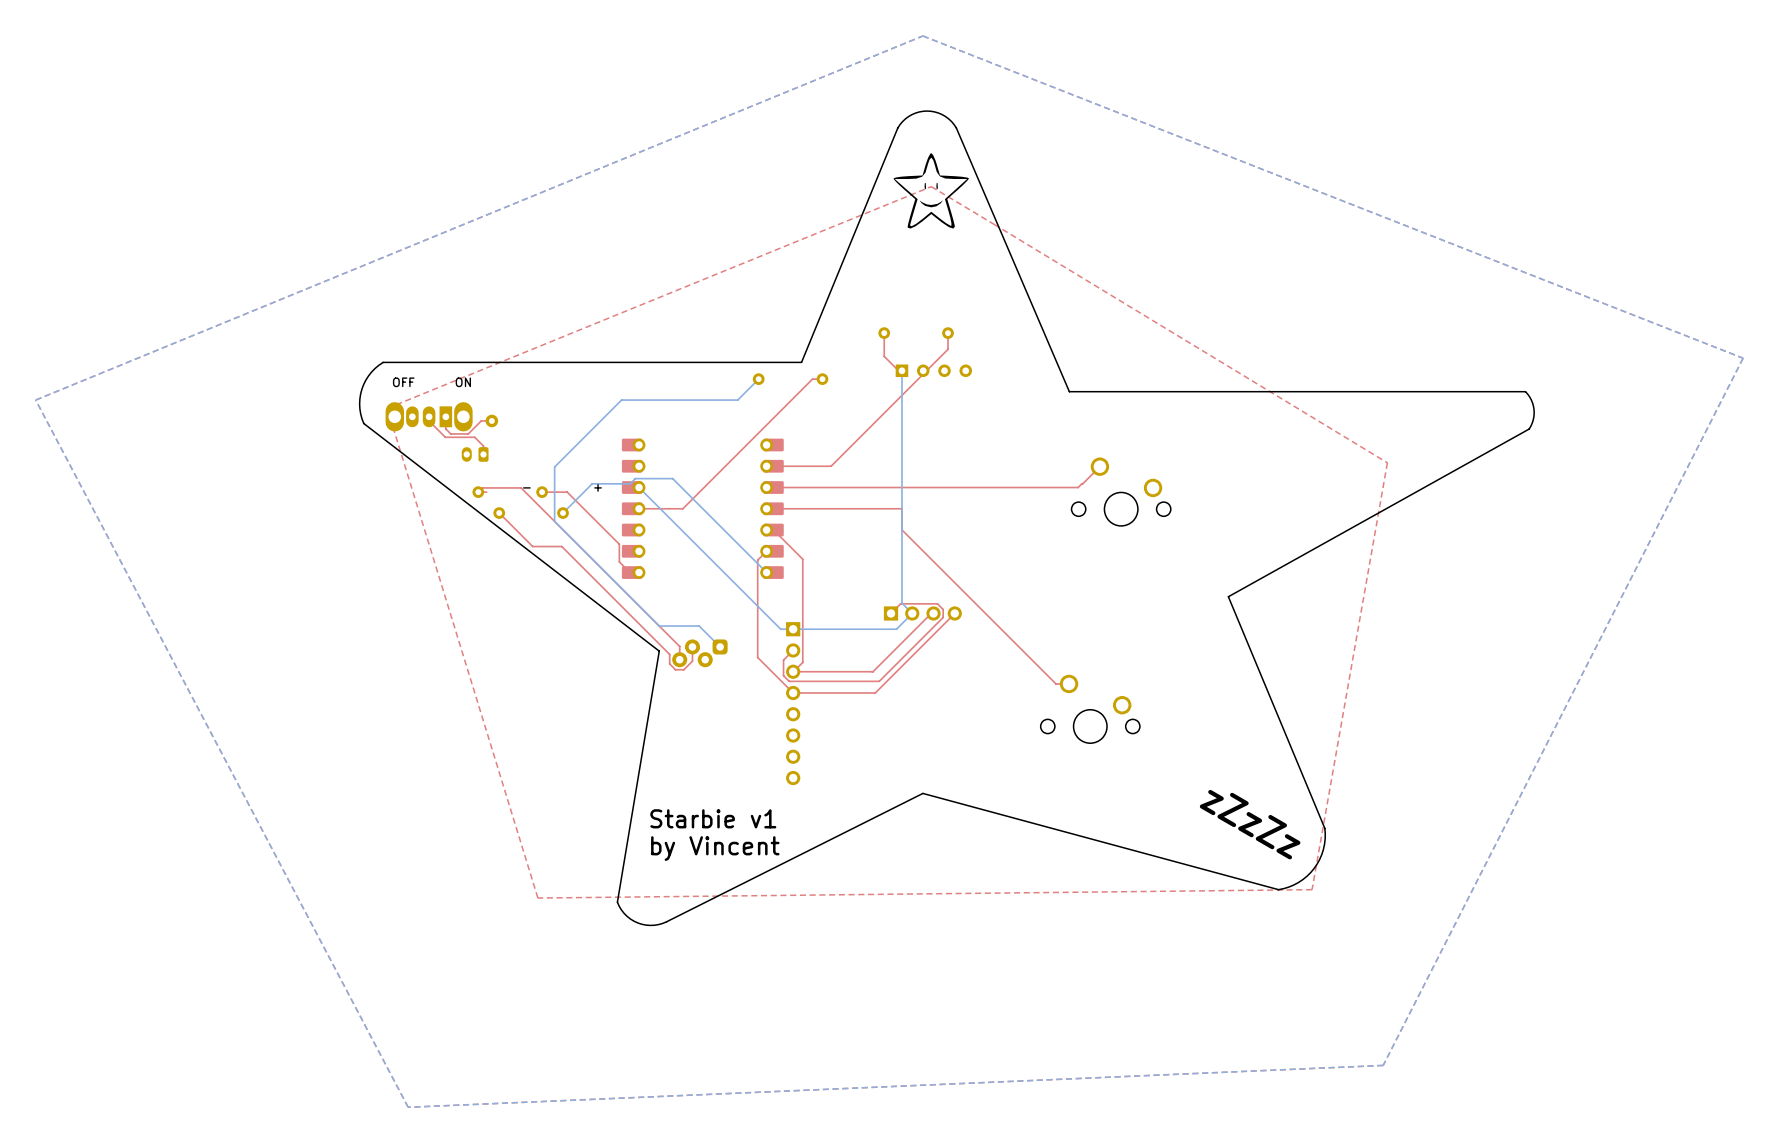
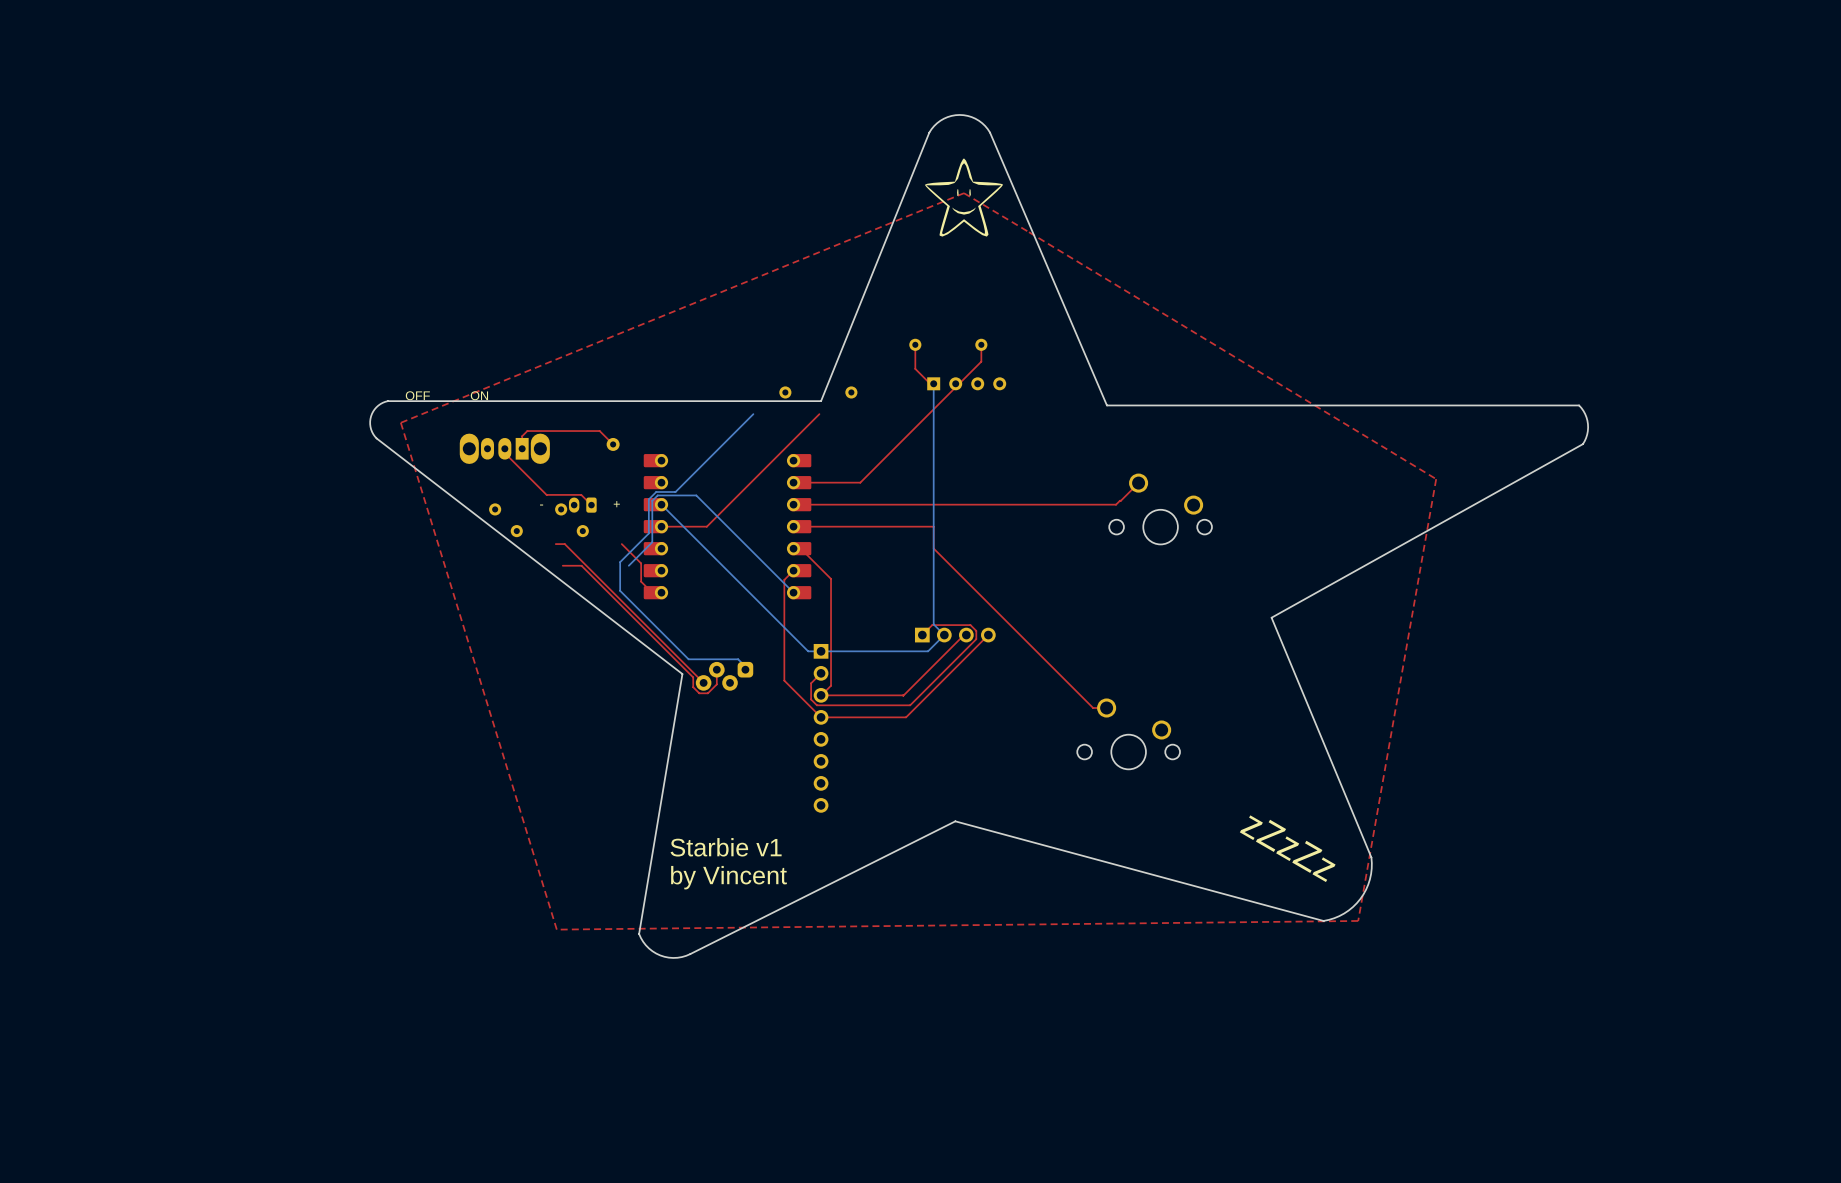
bottom zone outline: (922, 35) (1743, 358) (1383, 1065) (408, 1107) (35, 400) (922, 35) -> none
board edge: (897, 128) (801, 362) (383, 362) -> (929, 132) (821, 401) (387, 401) (378, 405) (371, 416) (371, 429) (376, 438)
board edge: (383, 362) (371, 372) (361, 389) (359, 409) (363, 423) -> none
bottom track: (758, 379) (737, 400) (621, 400) (554, 467) (554, 521) (659, 626) (699, 626) (720, 646) -> (753, 414) (675, 491) (656, 491) (648, 499) (648, 533) (620, 562) (620, 590) (688, 659) (738, 659) (745, 666) (745, 669)
top track: (822, 379) (812, 379) (791, 400) -> none
top track: (429, 416) (429, 420) (445, 437) (474, 437) (483, 446) (483, 454) -> none
part position: (429, 416) -> (504, 448)
top track: (445, 416) (445, 428) (450, 433) (468, 433) (481, 420) (491, 420) -> none
part position: (491, 420) -> (613, 444)
top track: none -> (613, 444) (599, 431) (527, 431) (522, 436) (522, 448)
top track: none -> (504, 448) (504, 453) (546, 494) (581, 494) (591, 505)
part position: (475, 454) -> (582, 505)
bottom track: (630, 483) (592, 483) (563, 513) -> (652, 500) (652, 542) (628, 565)
top track: (486, 492) (478, 492) (482, 487) (521, 487) (679, 646) (679, 659) -> (555, 544) (564, 544) (703, 682)
top track: (542, 492) (567, 492) (600, 525) -> none
top track: (499, 513) (532, 546) (543, 546) -> none

